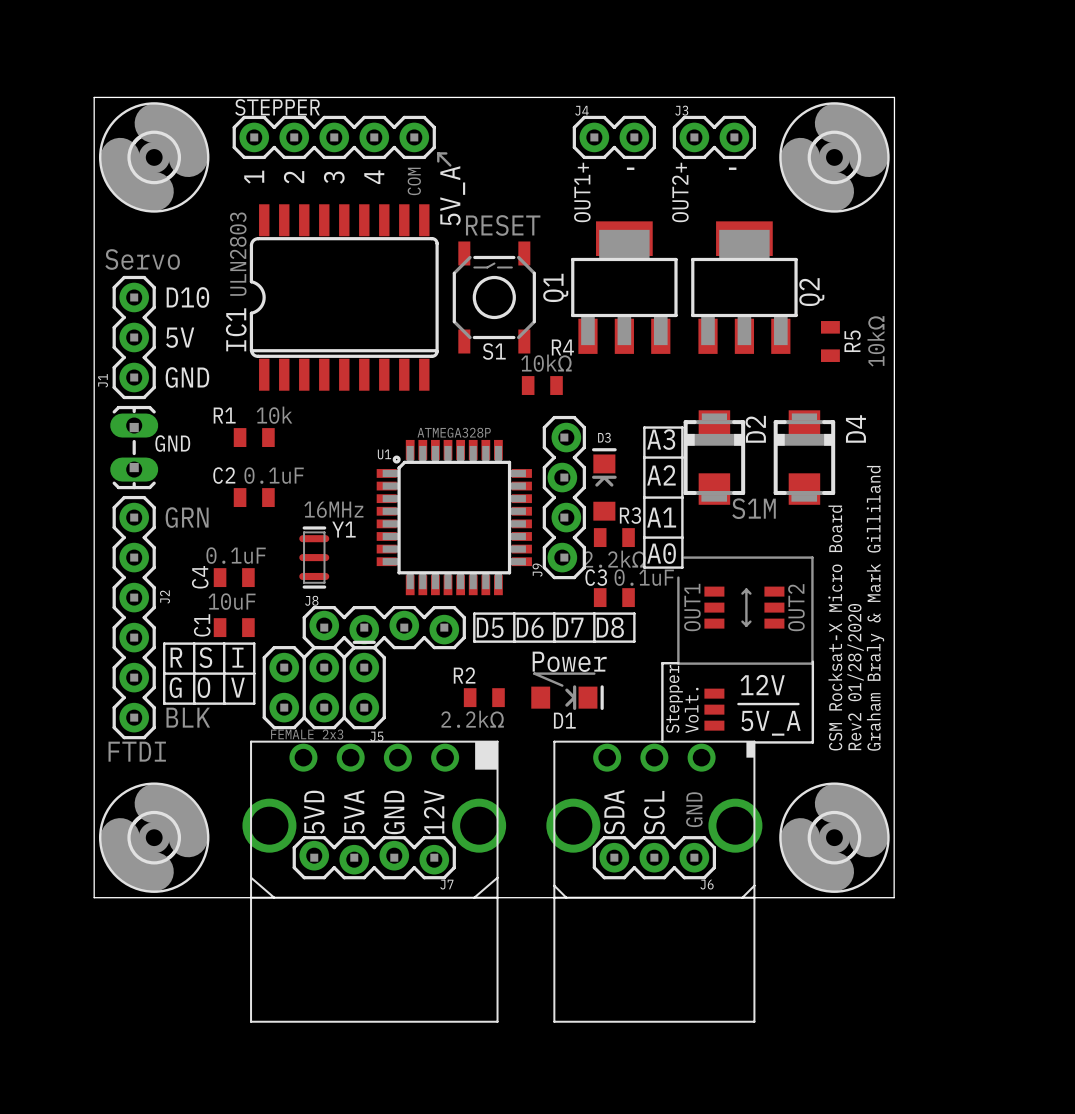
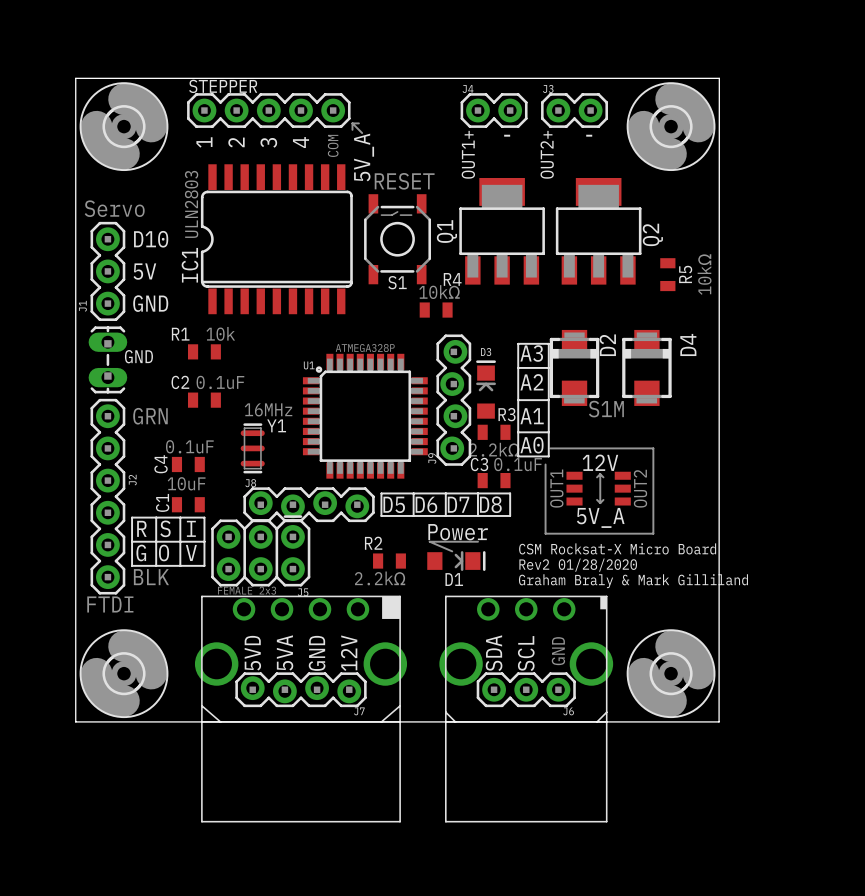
text rotation: 0° (875, 608) -> 90° clockwise (633, 581)
text rotation: 0° (835, 628) -> 90° clockwise (617, 548)
line: (812, 661) (812, 742) (754, 742) -> none
line: (678, 663) (662, 663) (662, 741) -> none
text rotation: 0° (855, 677) -> 90° clockwise (578, 565)
text position: 12V (762, 685) -> 12V (600, 462)
text: Stepper (674, 698) -> none
line: (738, 704) (798, 704) -> none
part: (714, 709) -> none
text: Volt. (691, 710) -> none
text position: 5V_A (770, 723) -> 5V_A (600, 517)

